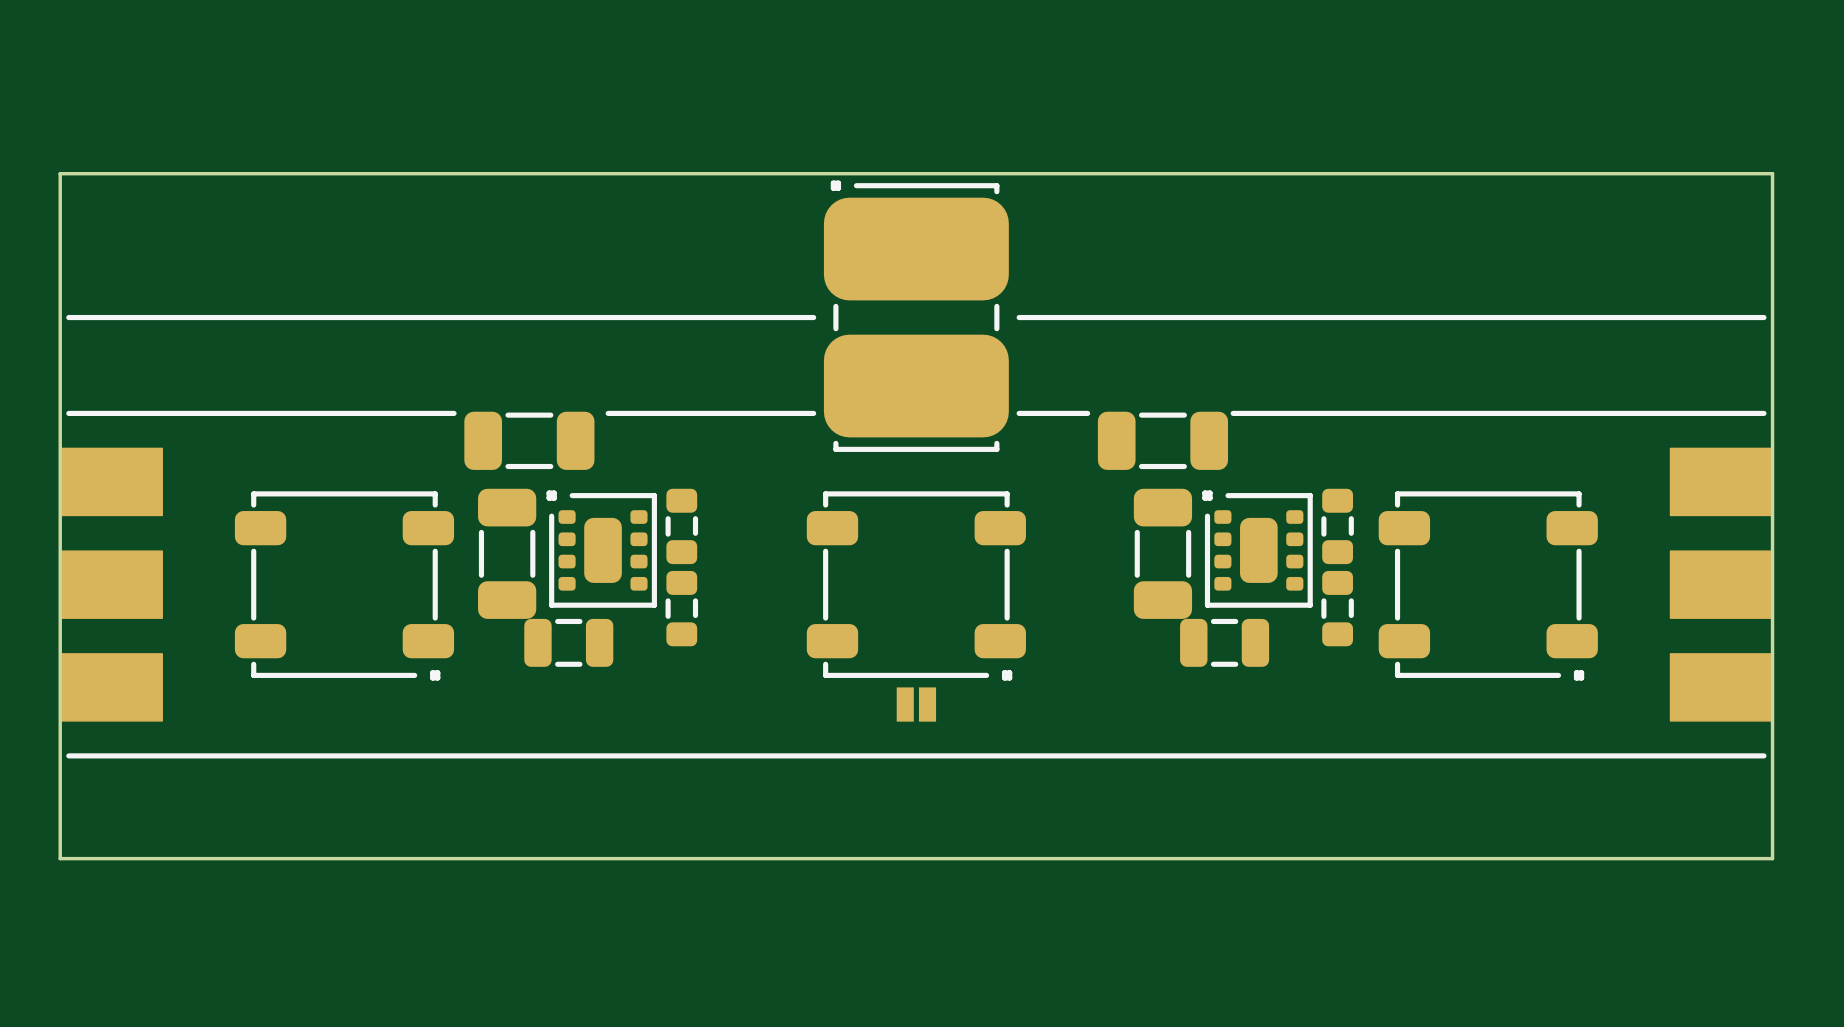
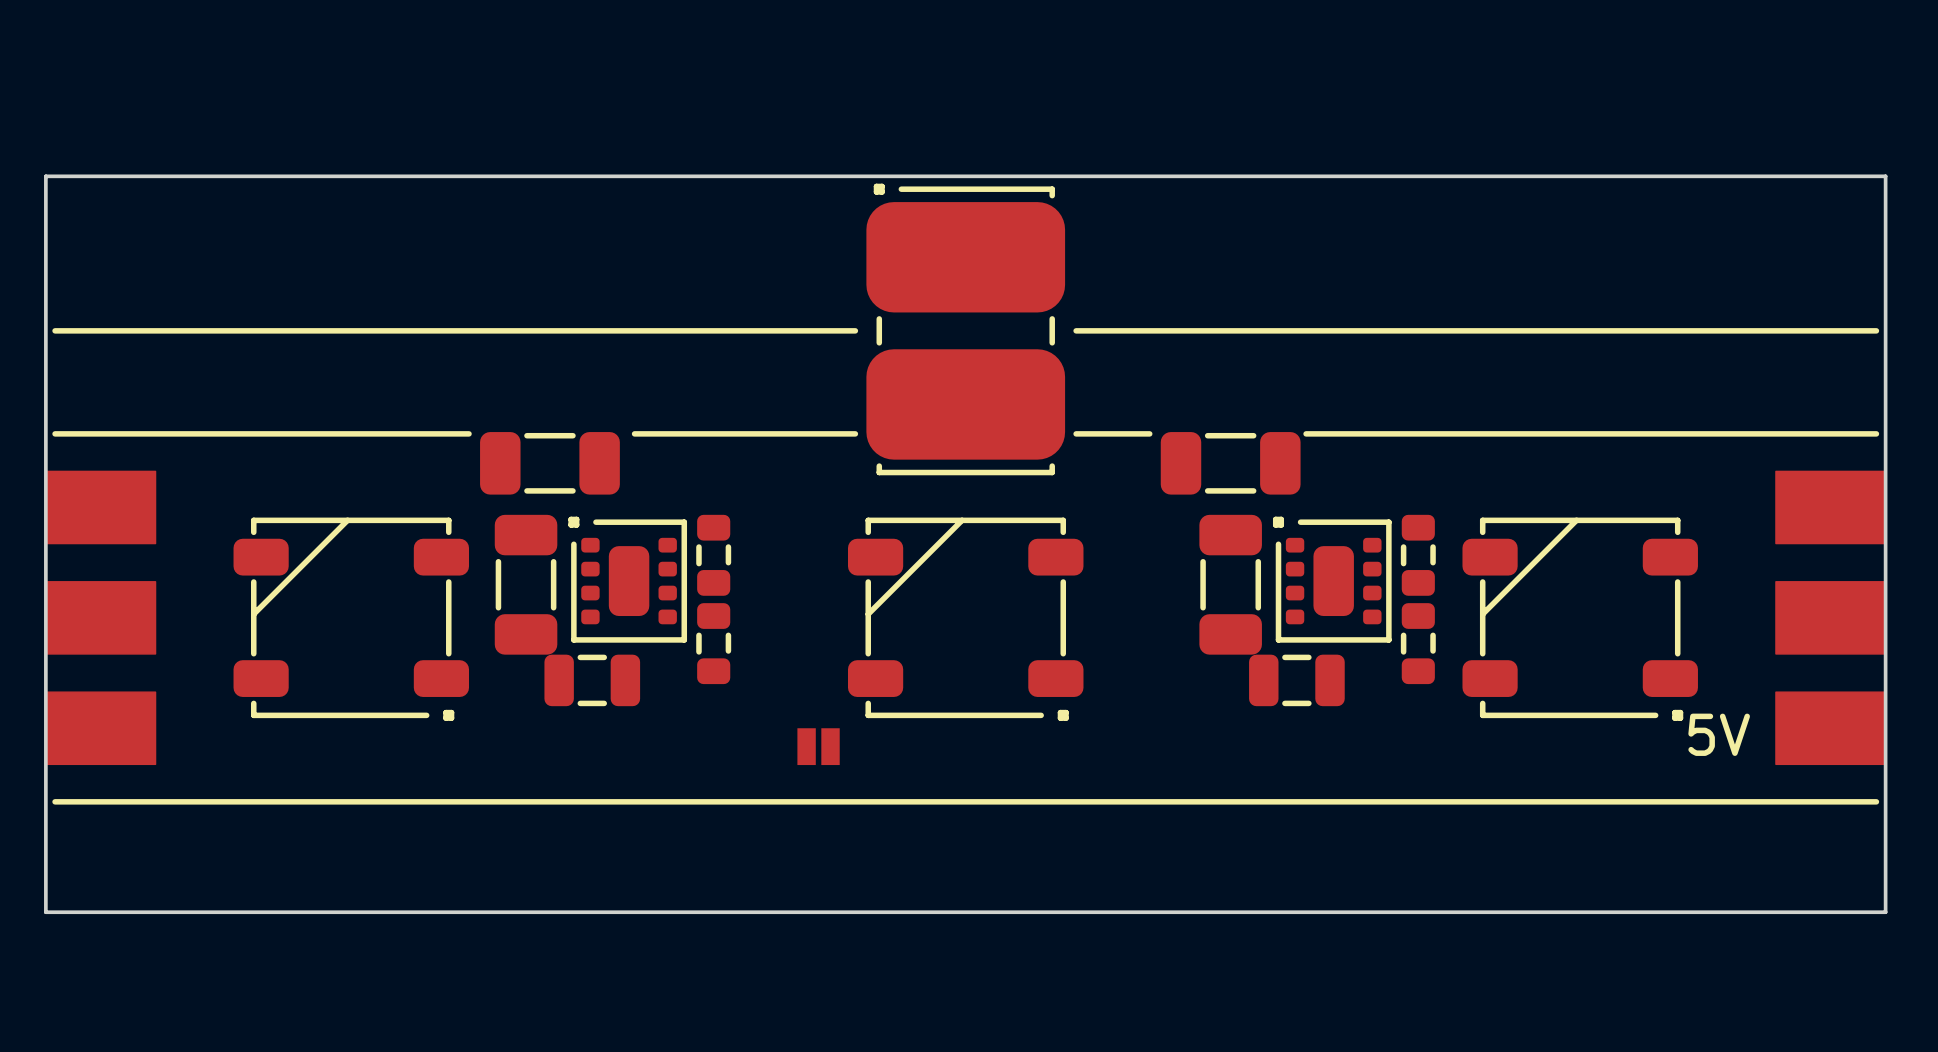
part footprint: [234, 491, 455, 681] -> [233, 517, 470, 721]
part footprint: [806, 491, 1026, 681] -> [847, 517, 1084, 721]
part footprint: [1378, 491, 1598, 681] -> [1462, 517, 1698, 721]
text: none -> 5V (1719, 734)
part position: (916, 704) -> (818, 746)

